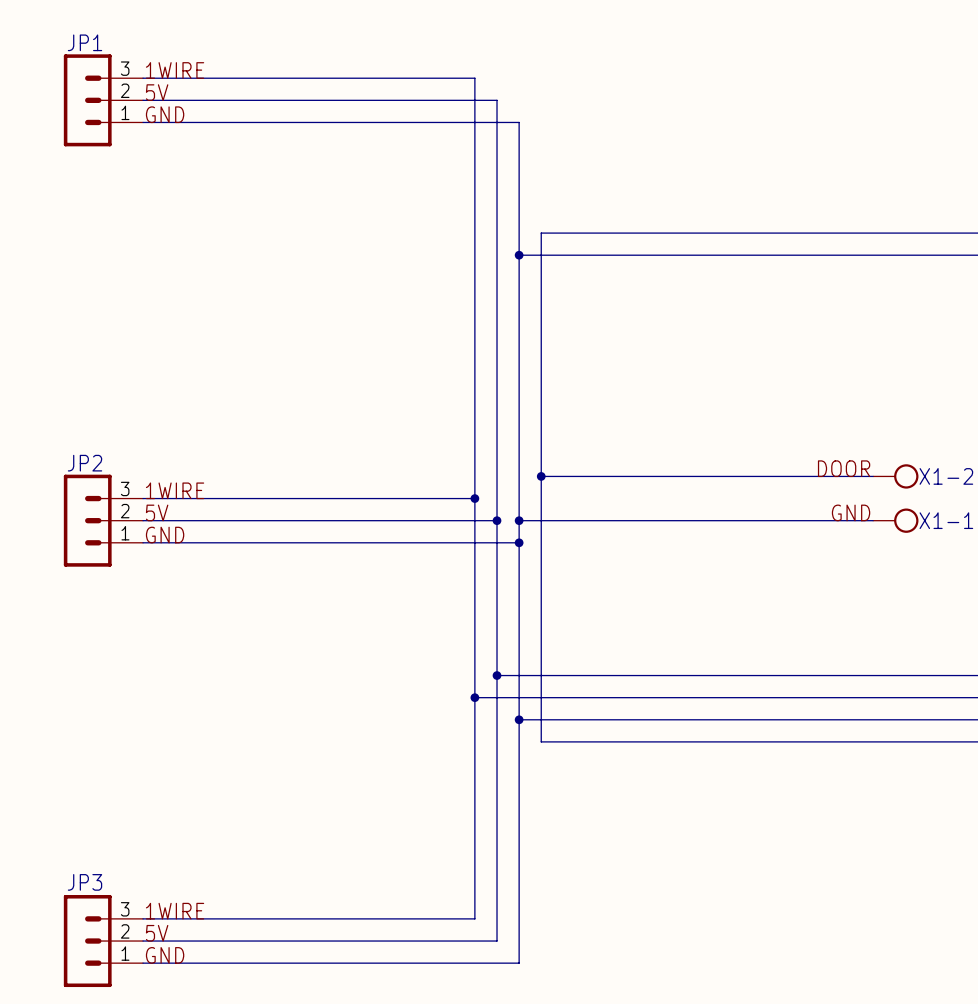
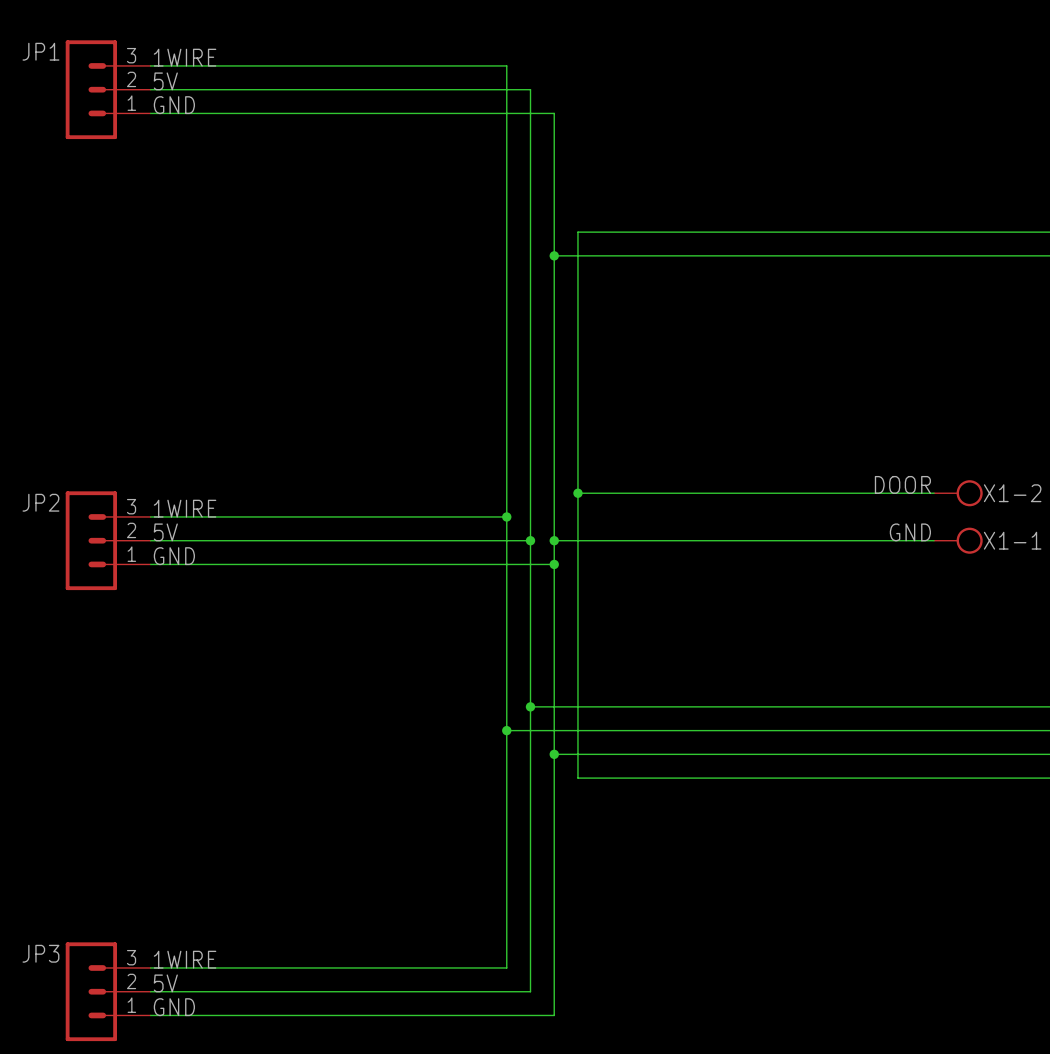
JP1 name position: JP1 (85, 42) -> JP1 (40, 51)
JP2 name position: JP2 (85, 463) -> JP2 (40, 502)
JP3 name position: JP3 (85, 882) -> JP3 (40, 953)

